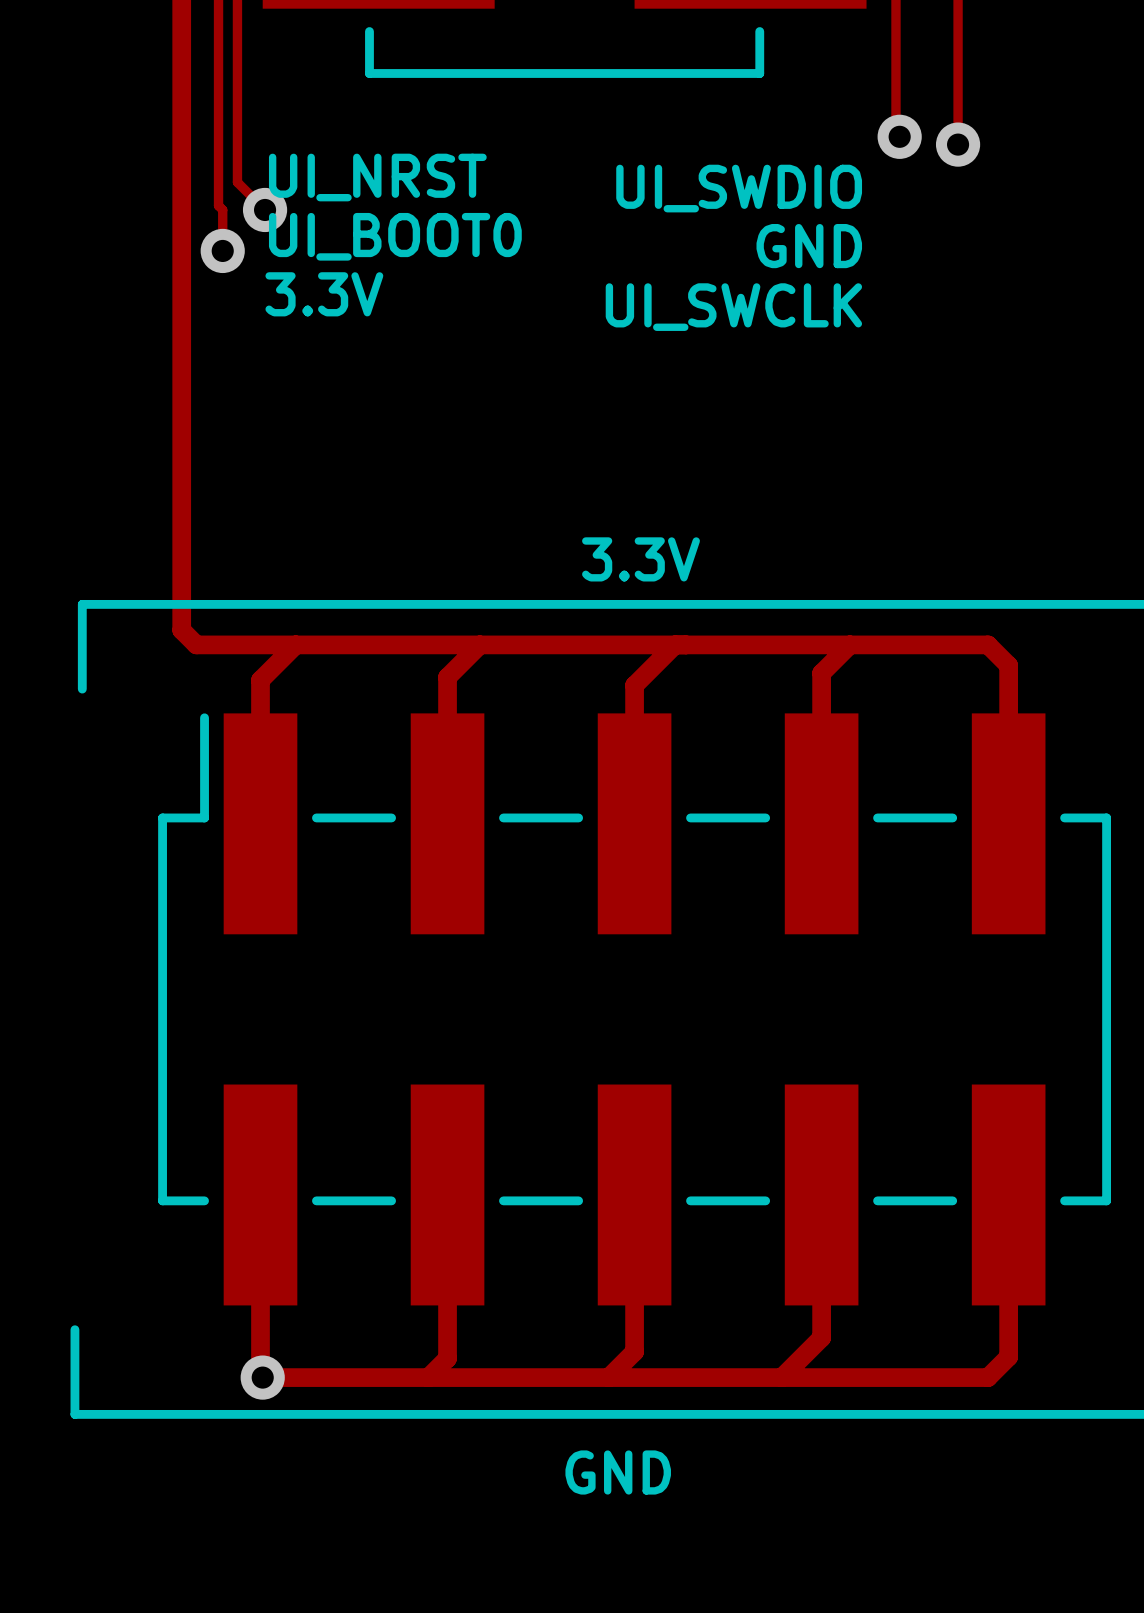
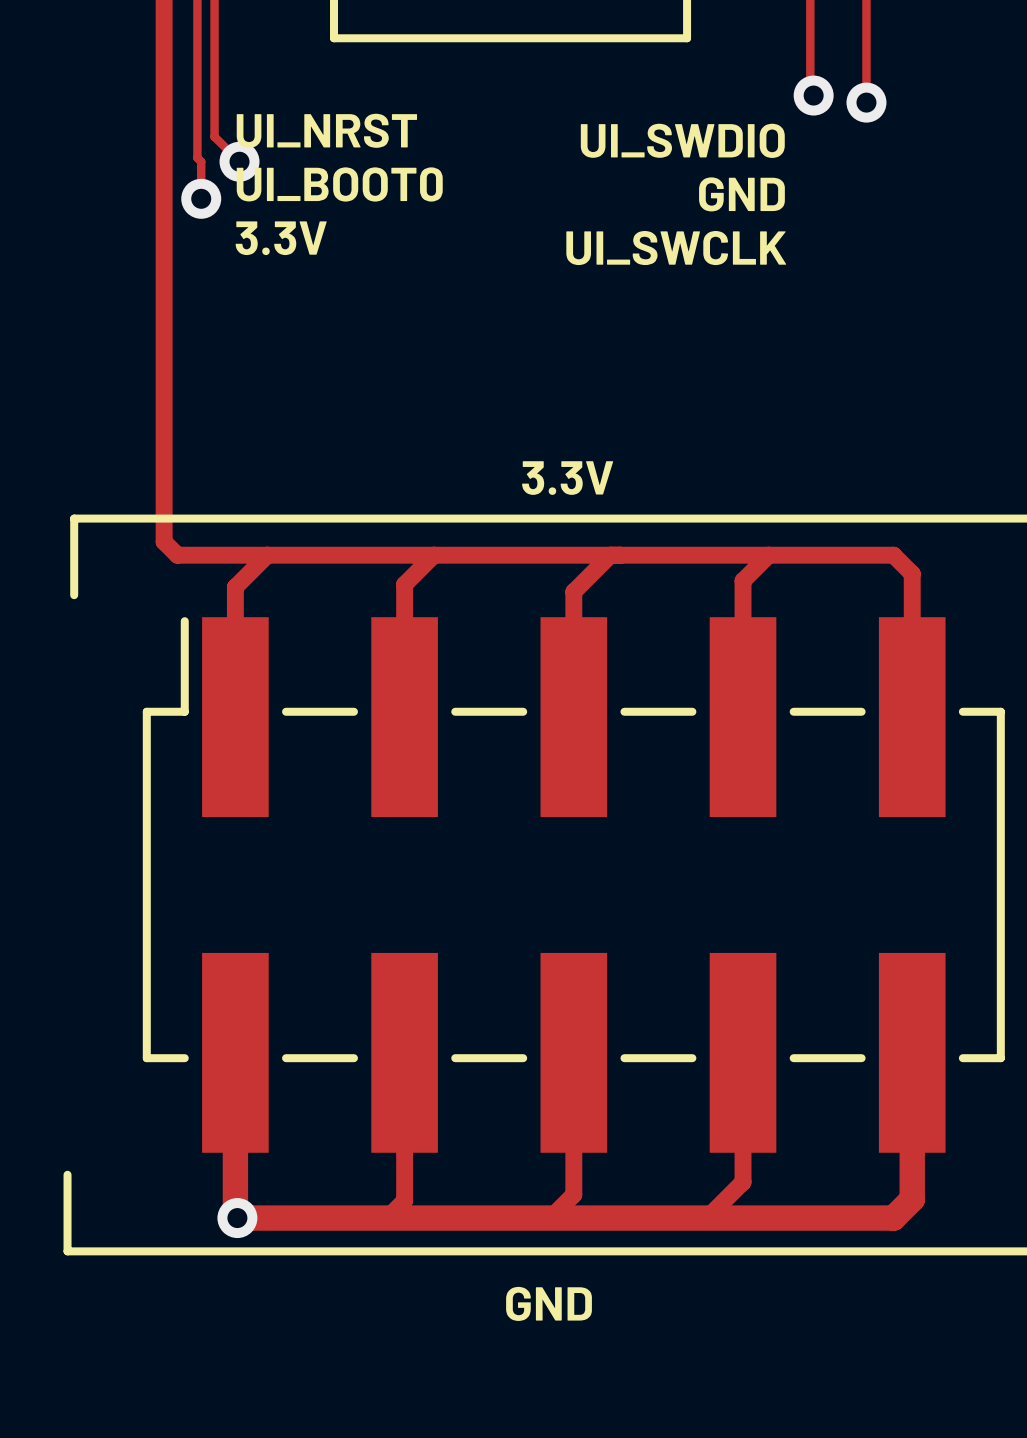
track width: thin (260, 1194) (260, 1375) (262, 1377) (988, 1377) (1008, 1356) (1008, 1194) -> thick (235, 1052) (235, 1216) (237, 1218) (893, 1218) (912, 1199) (912, 1052)

